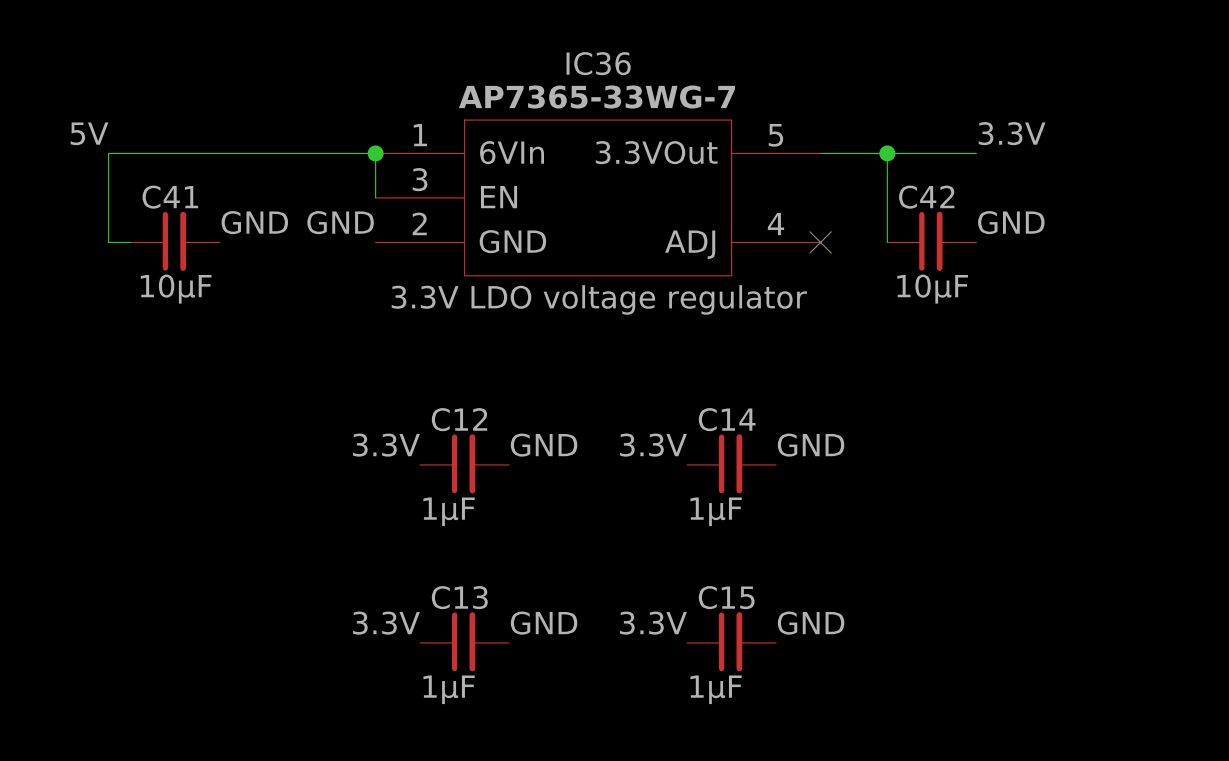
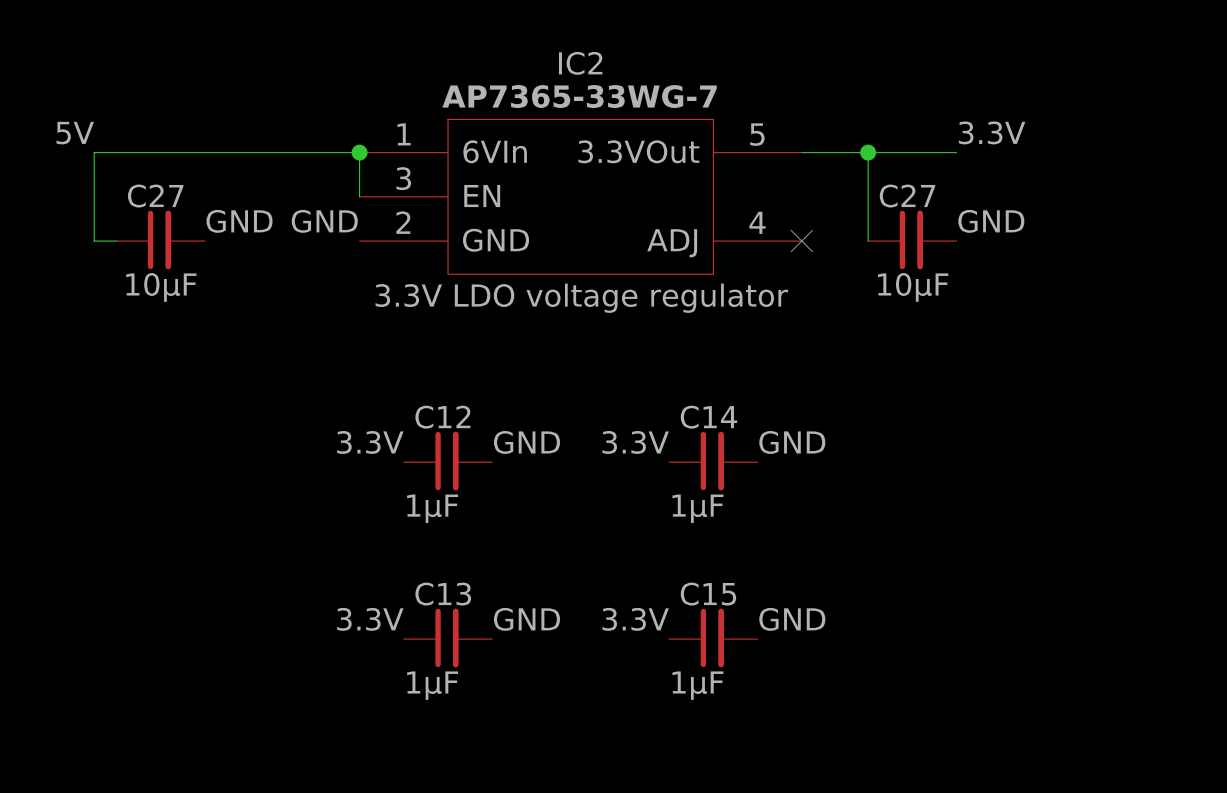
IC36 name: IC36 (598, 63) -> IC2 (580, 63)
C41 name: C41 (170, 197) -> C27 (155, 196)
C42 name: C42 (926, 197) -> C27 (907, 196)

